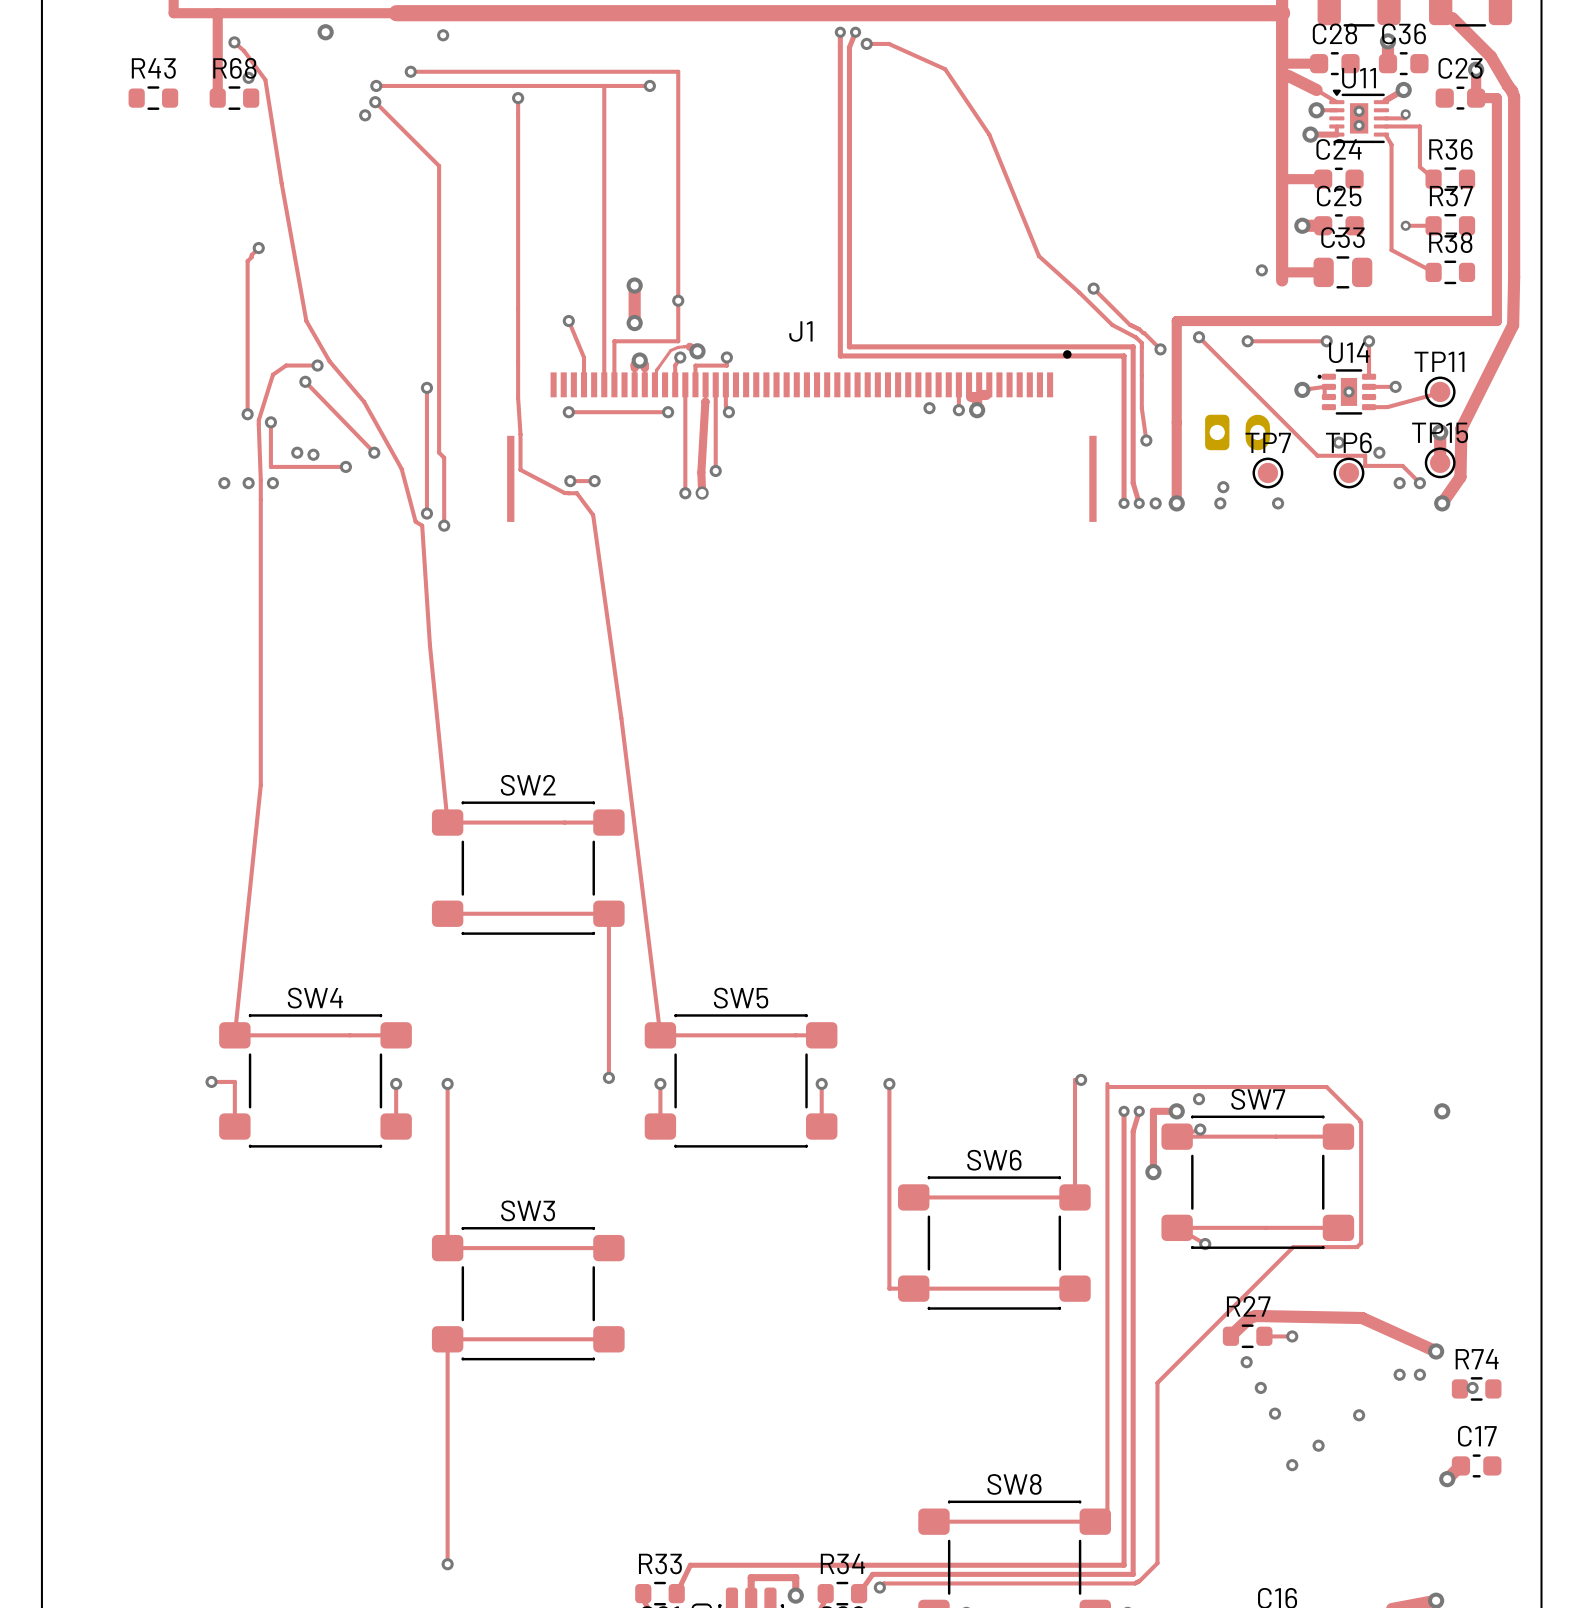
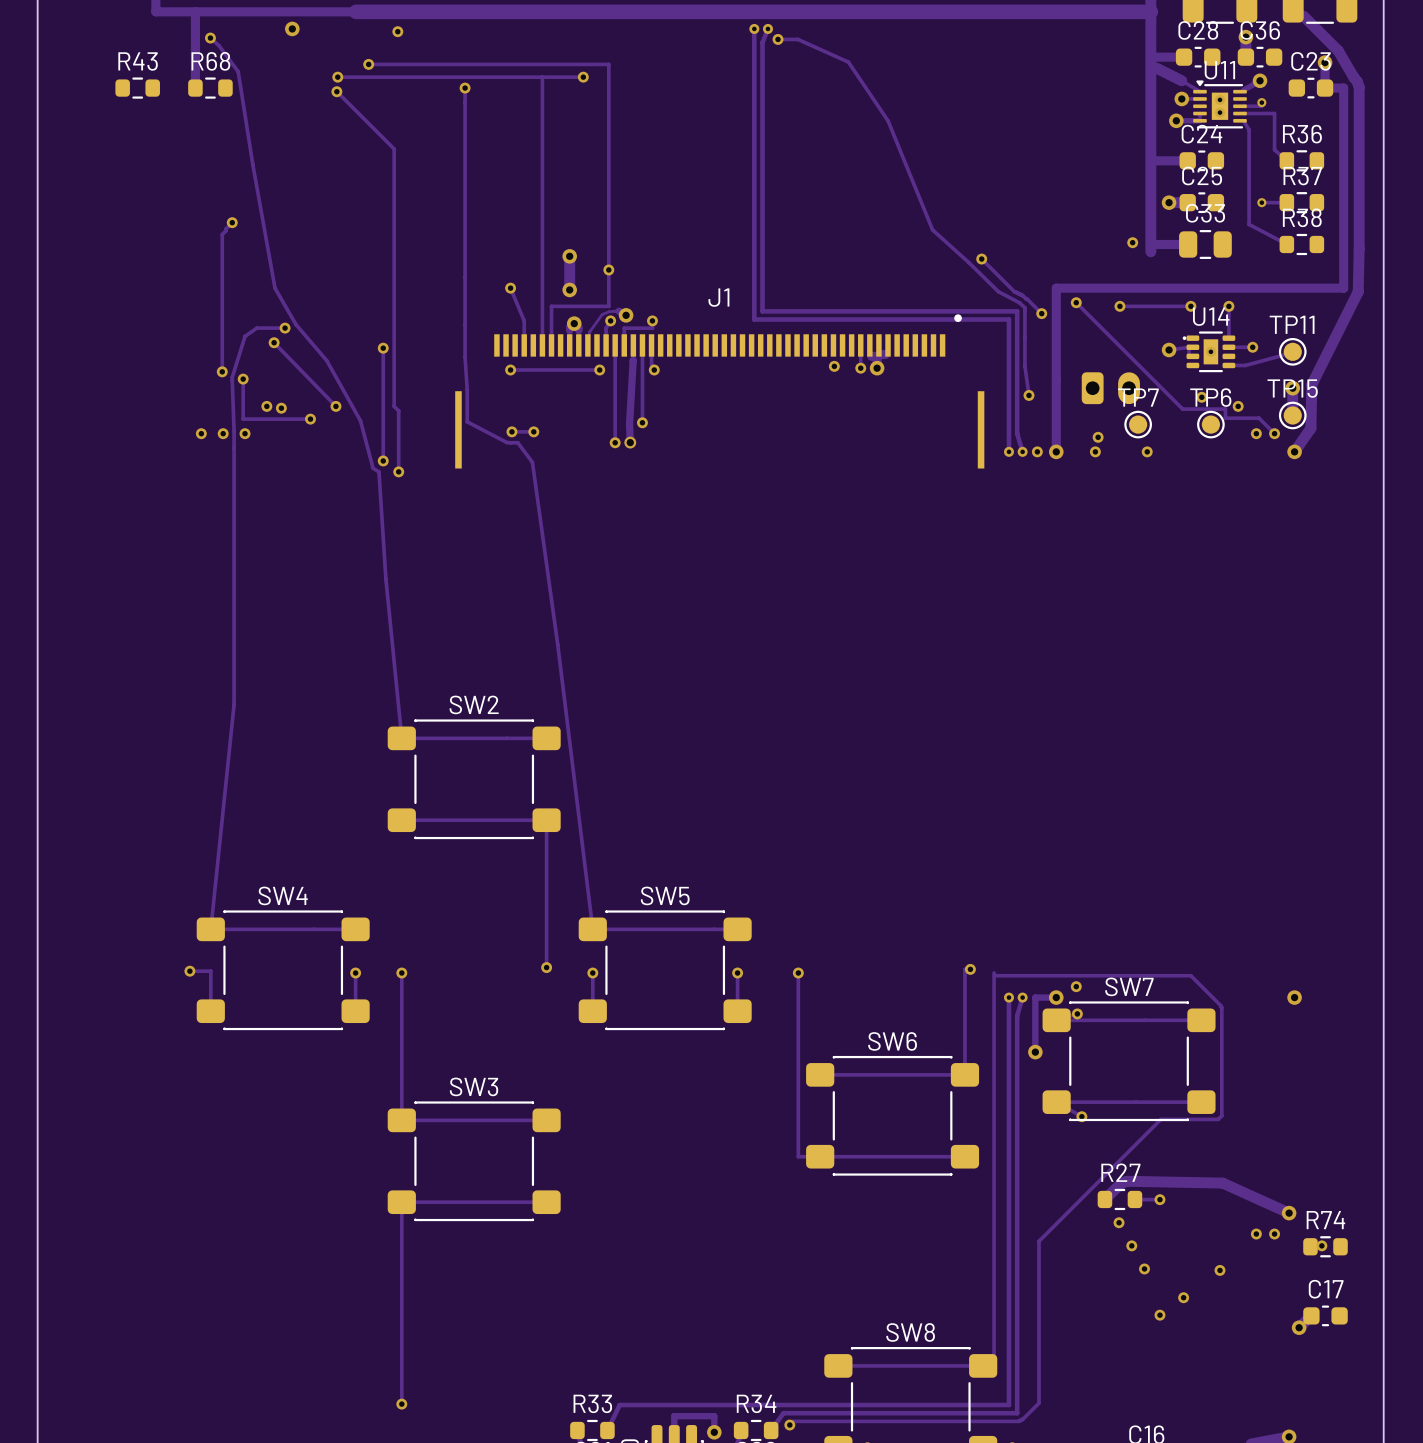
via: (248, 77) -> none
via: (365, 115) -> none

